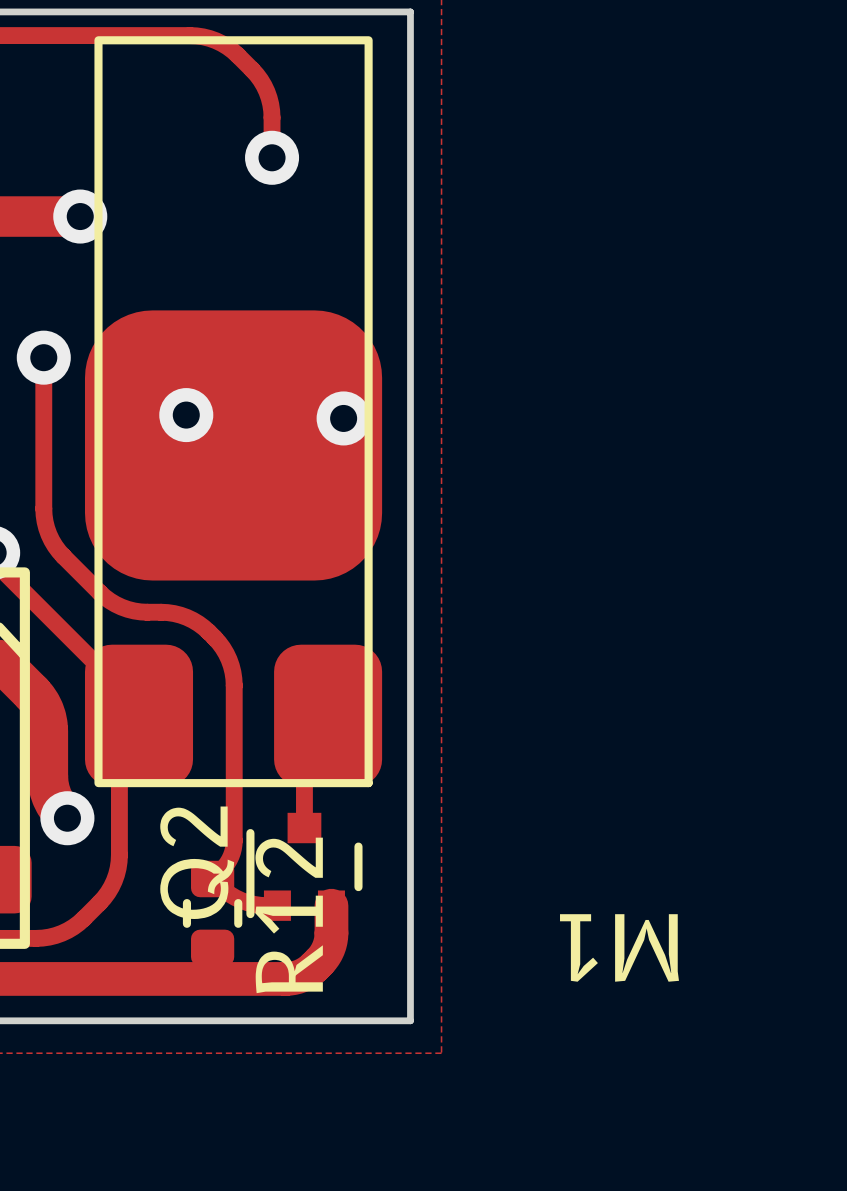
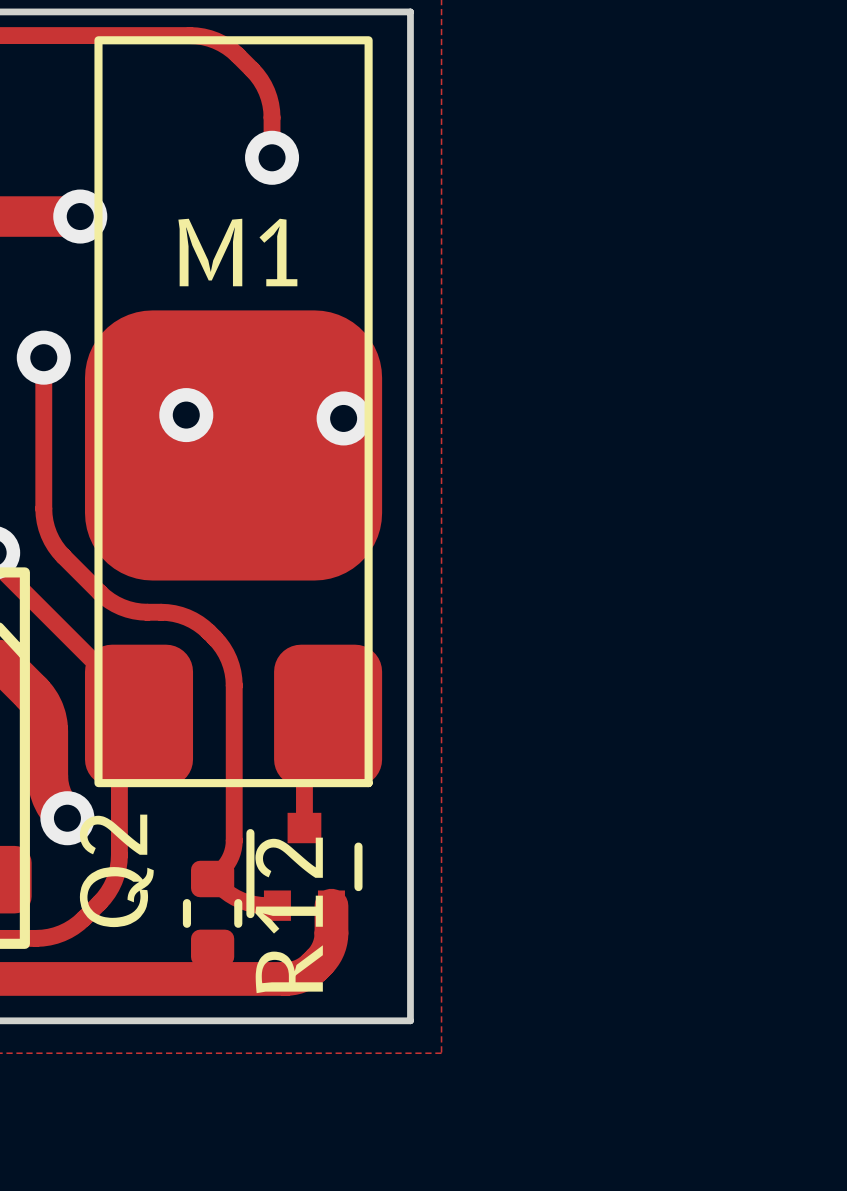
Q2 name position: Q2 (197, 862) -> Q2 (116, 870)
M1 name rotation: 0° (619, 947) -> 180° (237, 252)
M1 name position: M1 (619, 947) -> M1 (237, 252)

